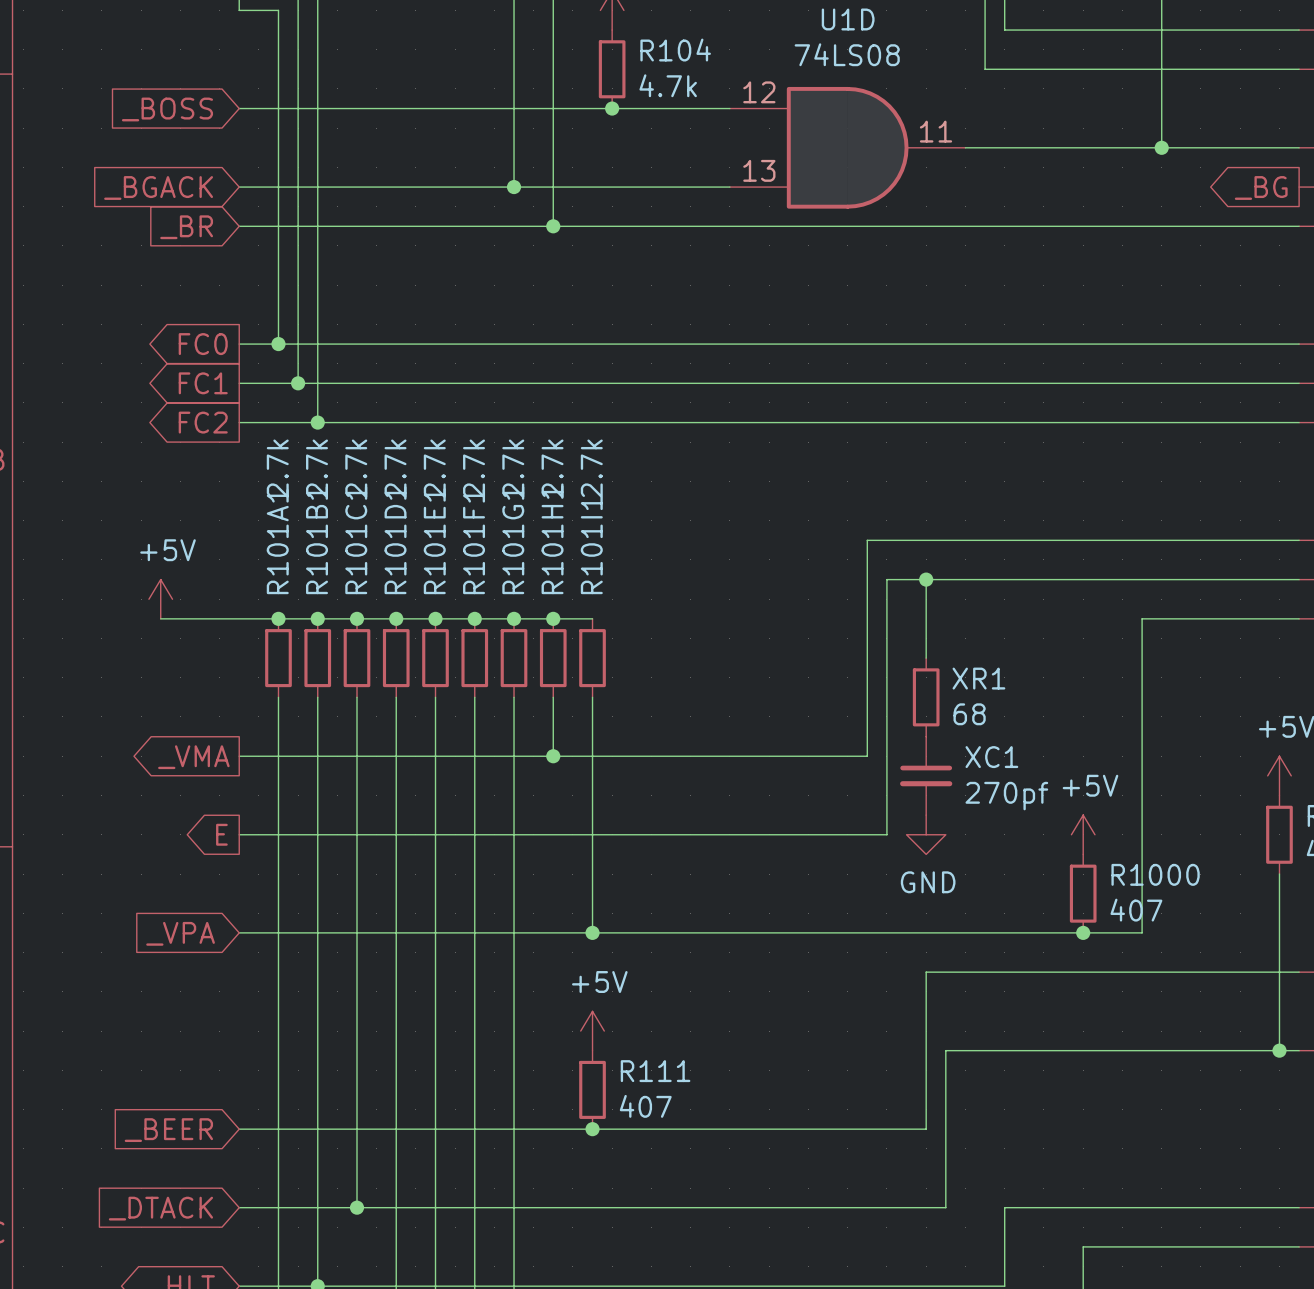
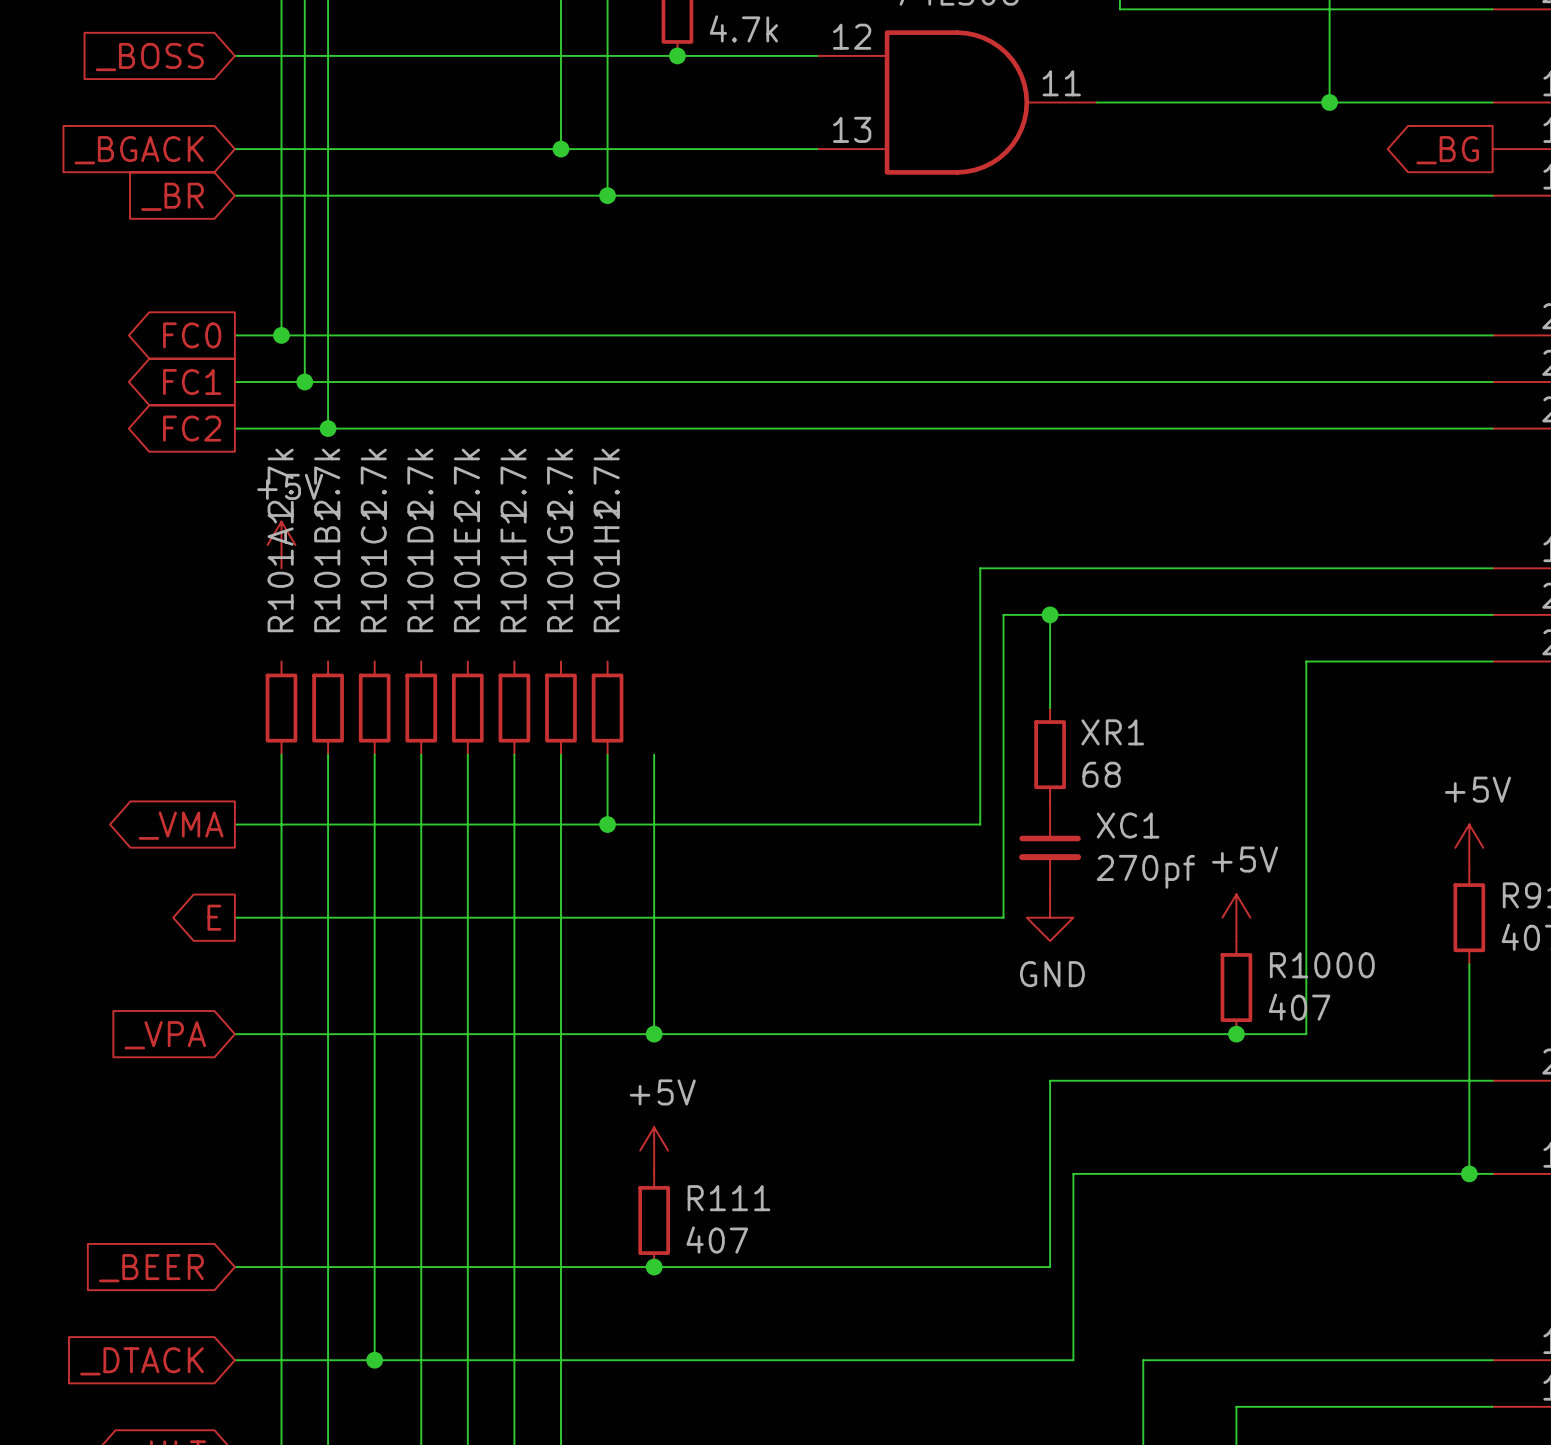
power symbol position: +5V (160, 599) -> +5V (281, 545)
wire: (160, 618) (592, 618) -> none
junction: (278, 618) -> none
junction: (317, 618) -> none
junction: (357, 618) -> none
junction: (396, 618) -> none
junction: (435, 618) -> none
junction: (474, 618) -> none
junction: (514, 618) -> none
junction: (553, 618) -> none
R101I1: 2.7k (592, 658) -> none

